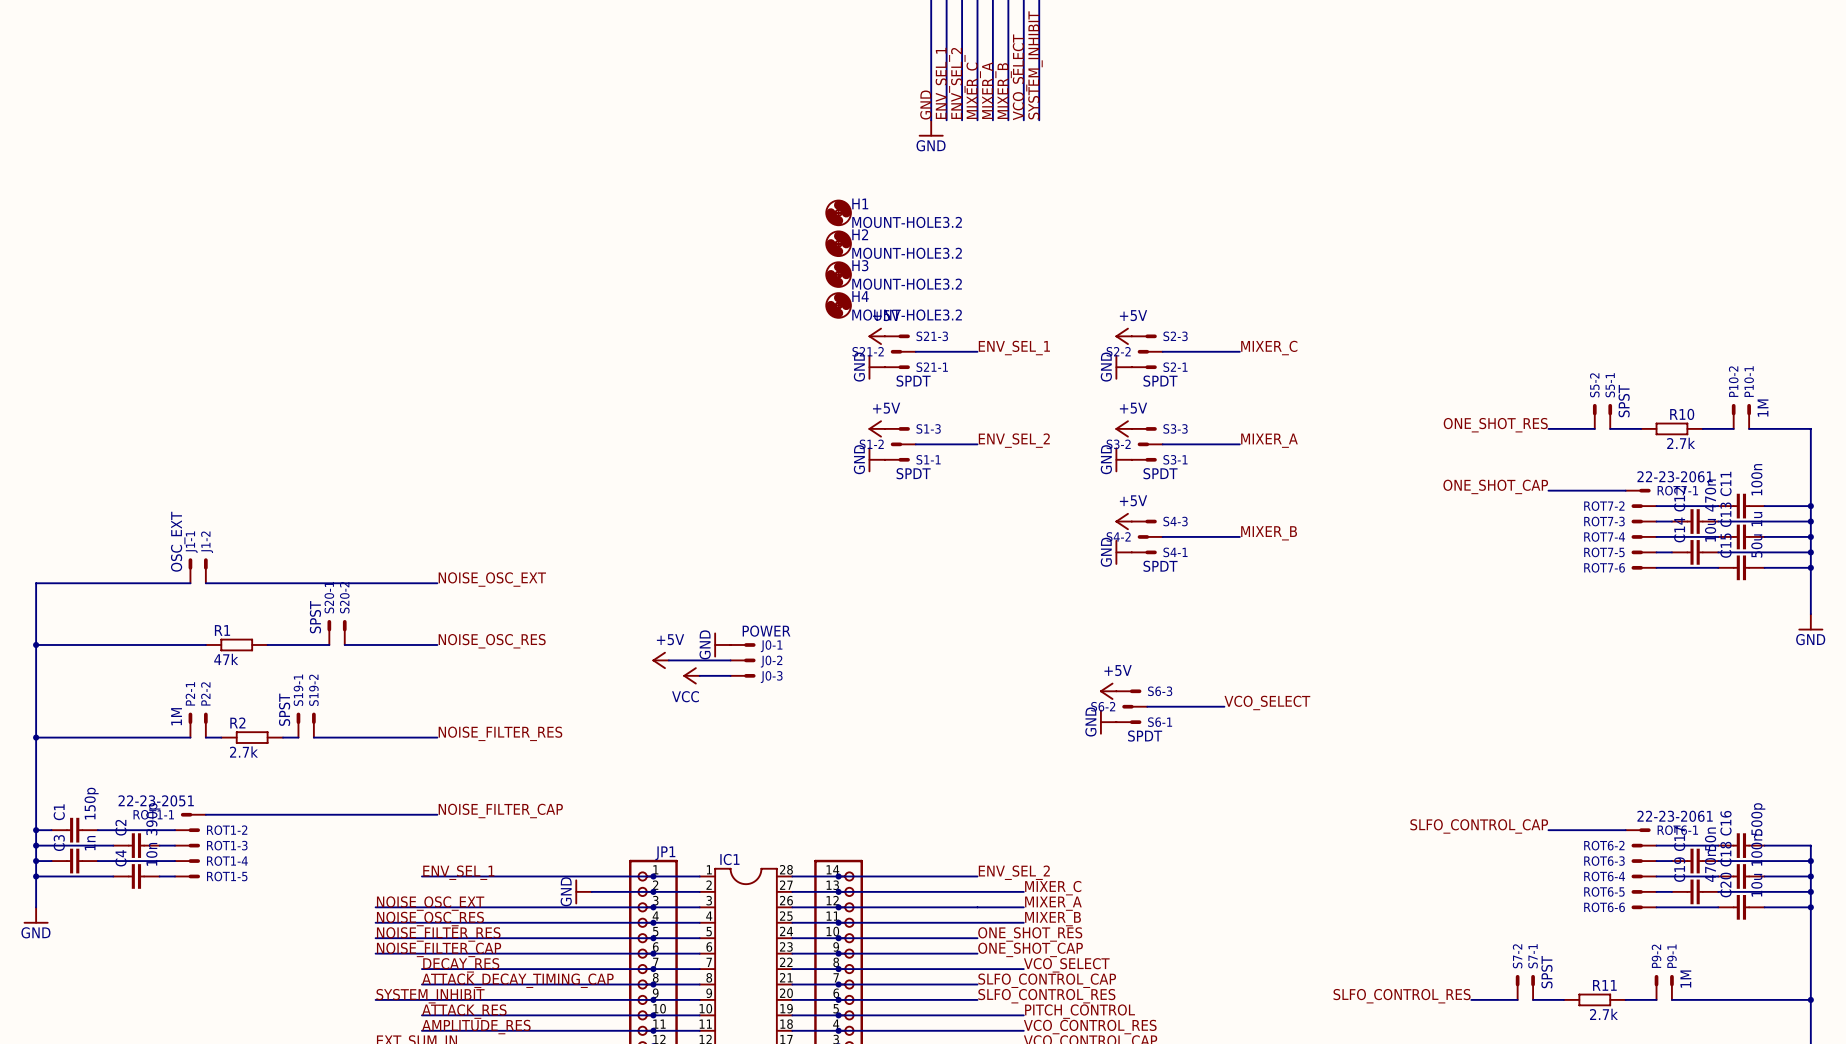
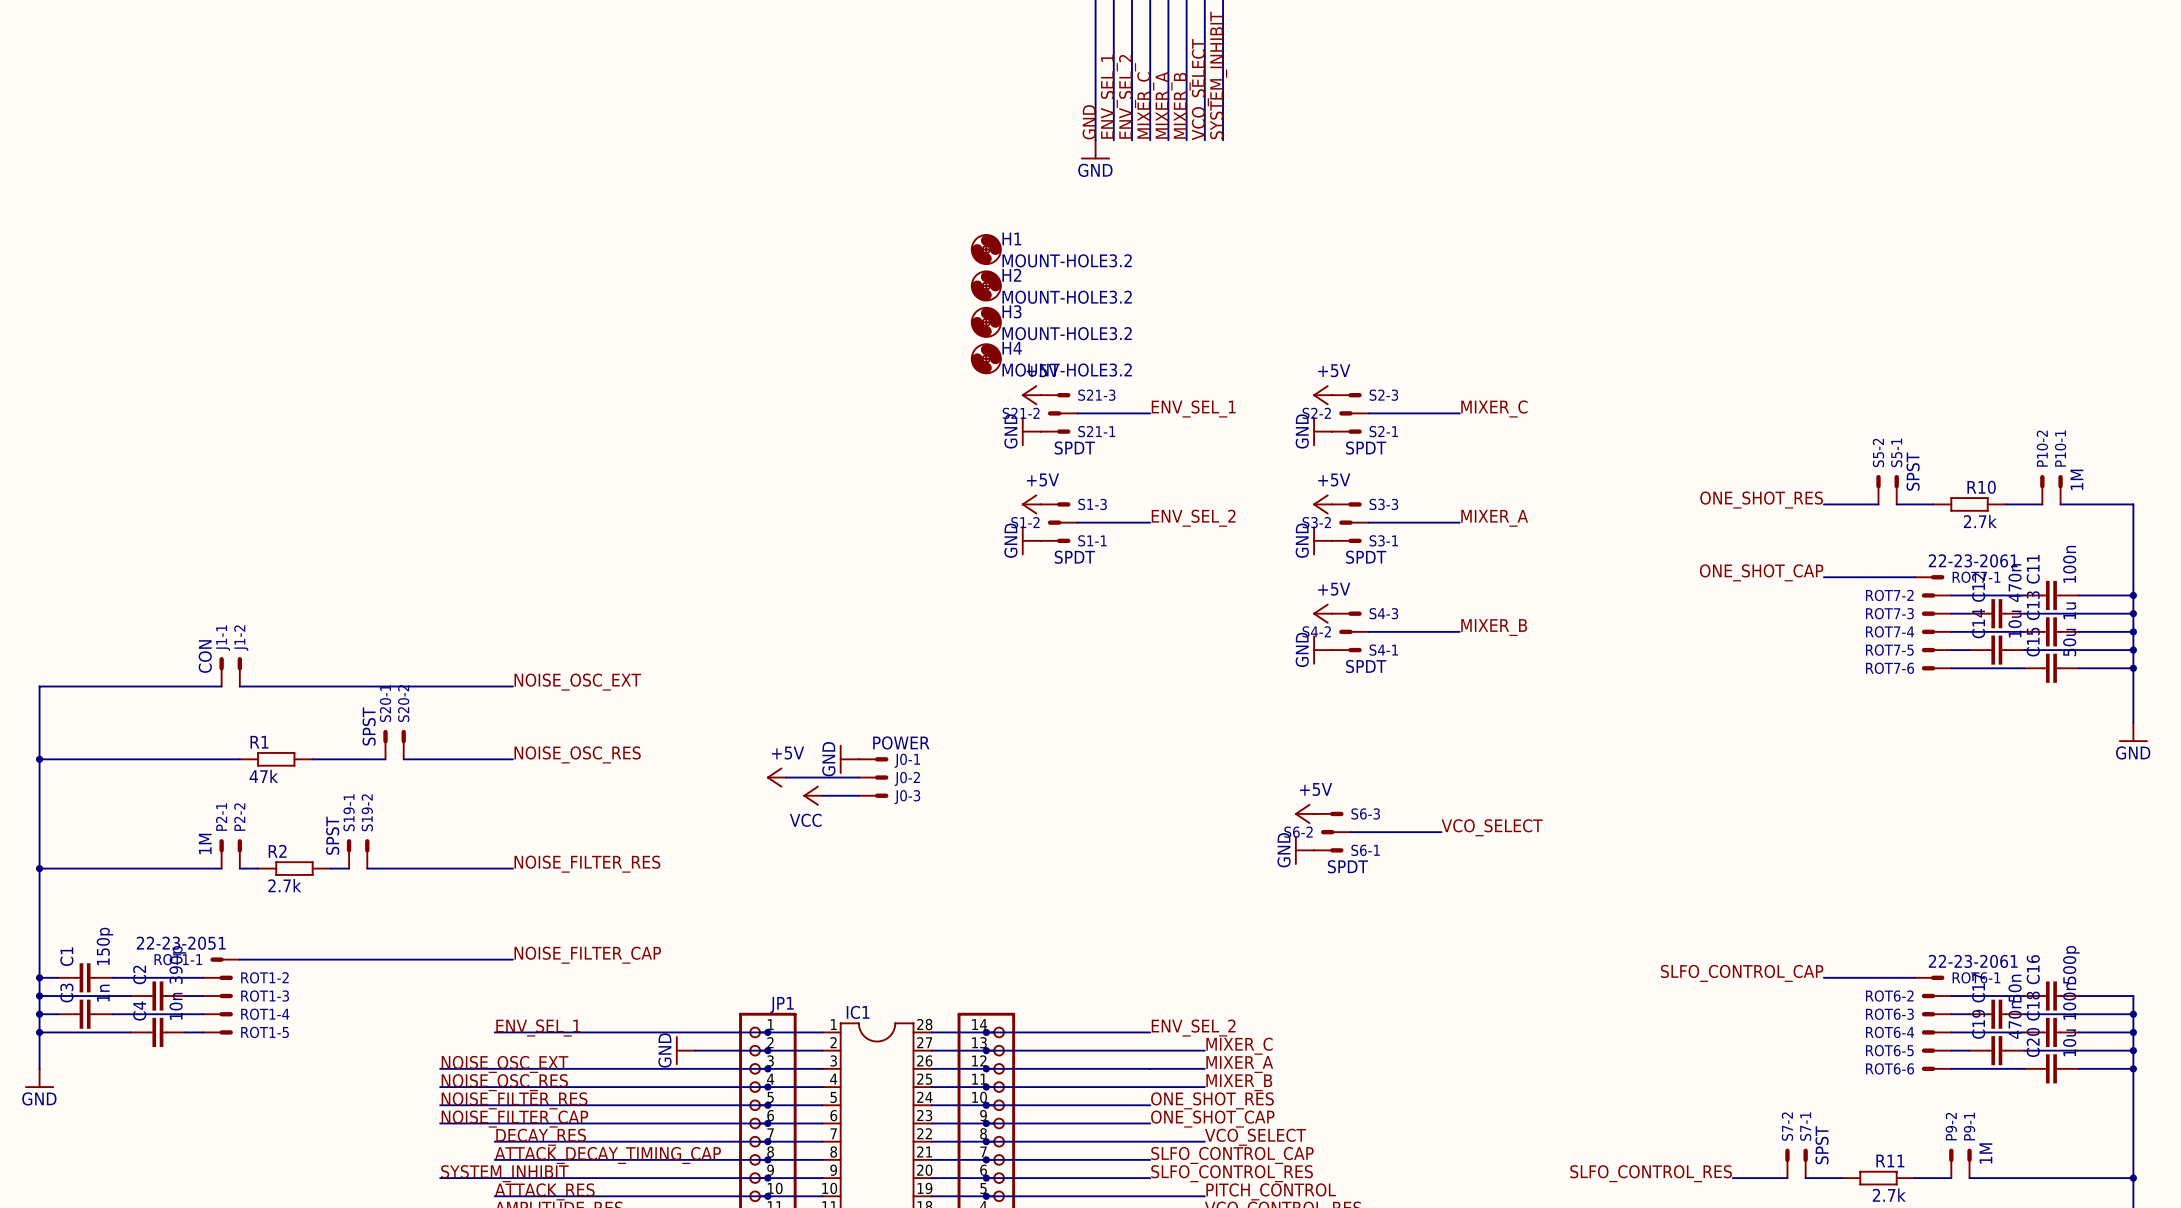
J1-1 value: OSC_EXT (178, 541) -> CON (205, 656)

